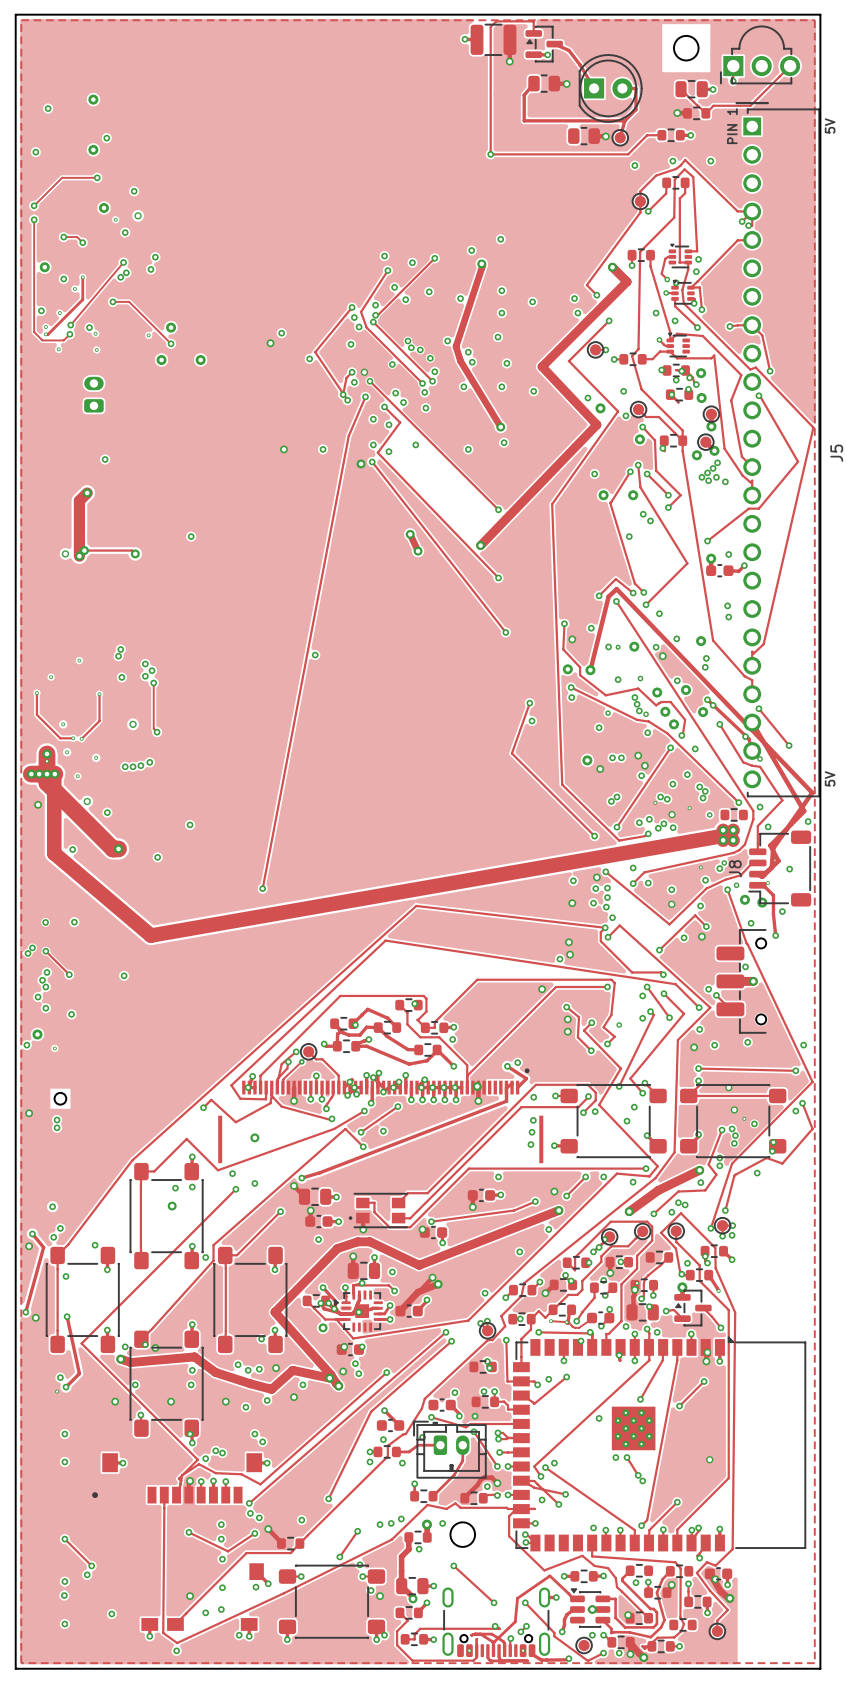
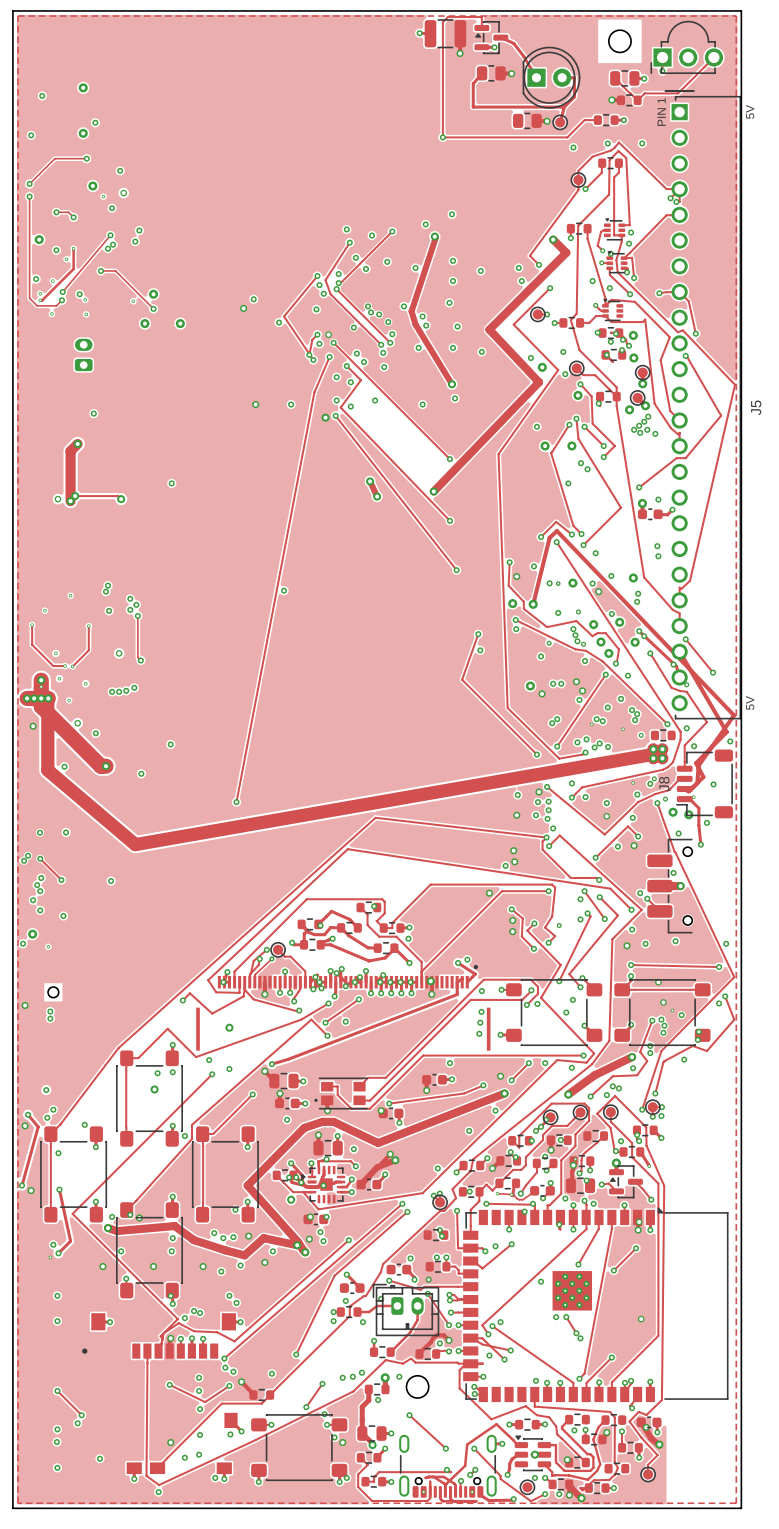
via: (672, 814) -> none

